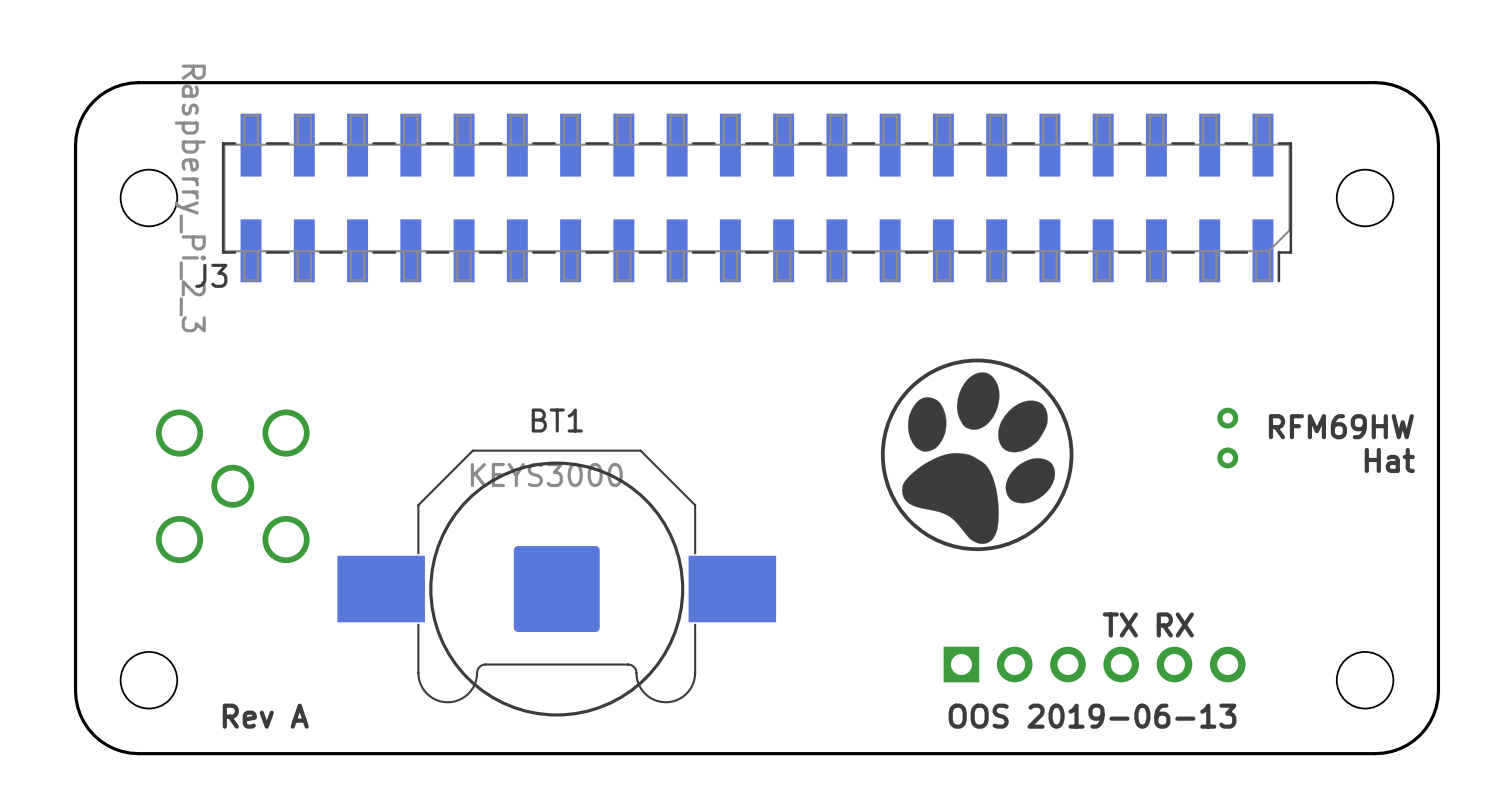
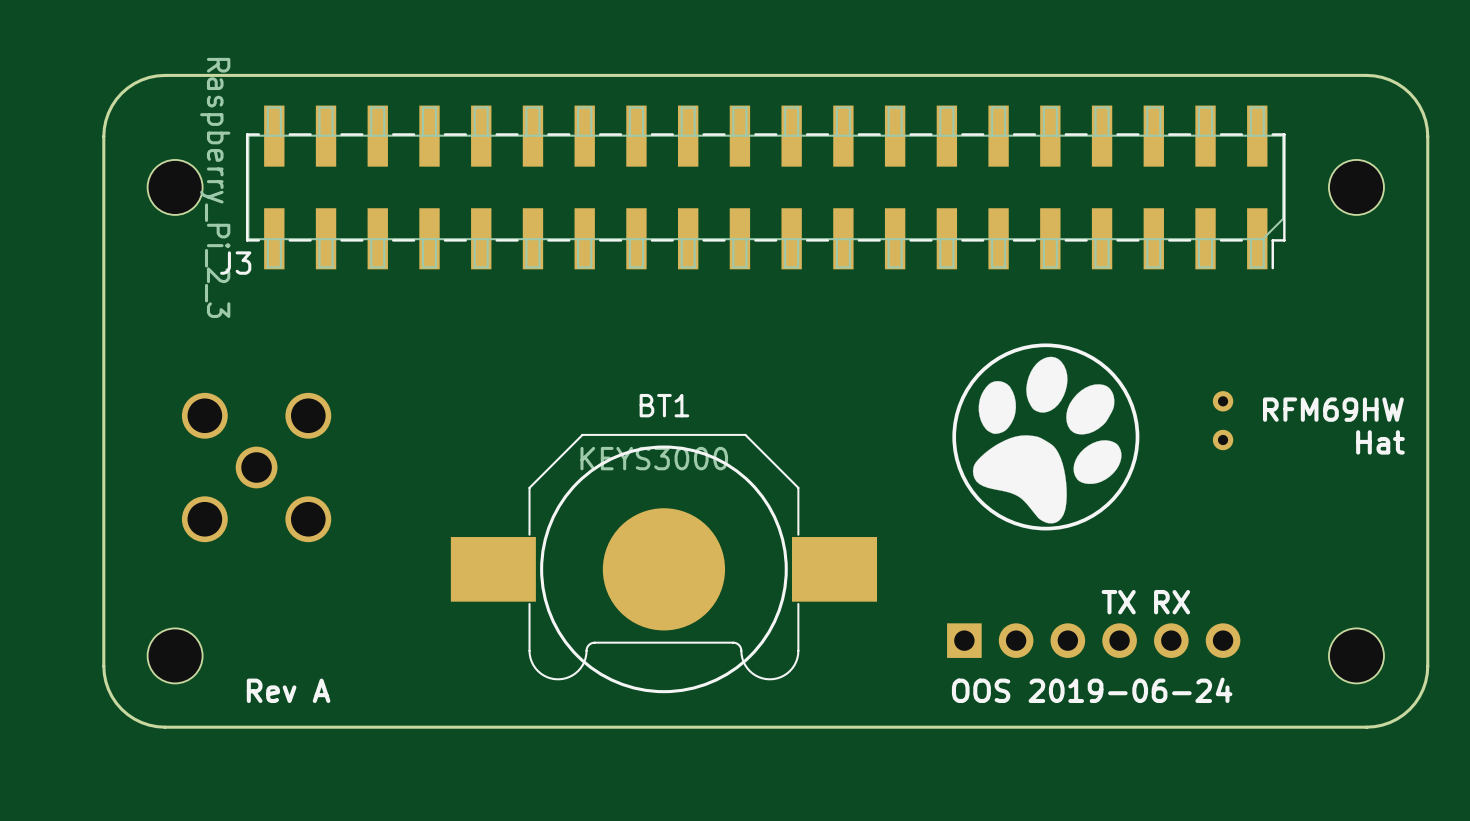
BT1 footprint: [337, 449, 777, 717] -> [450, 433, 878, 694]
drawing position: (977, 454) -> (1045, 436)
text: OOS 2019-06-13 (1092, 716) -> OOS 2019-06-24 (1092, 690)

